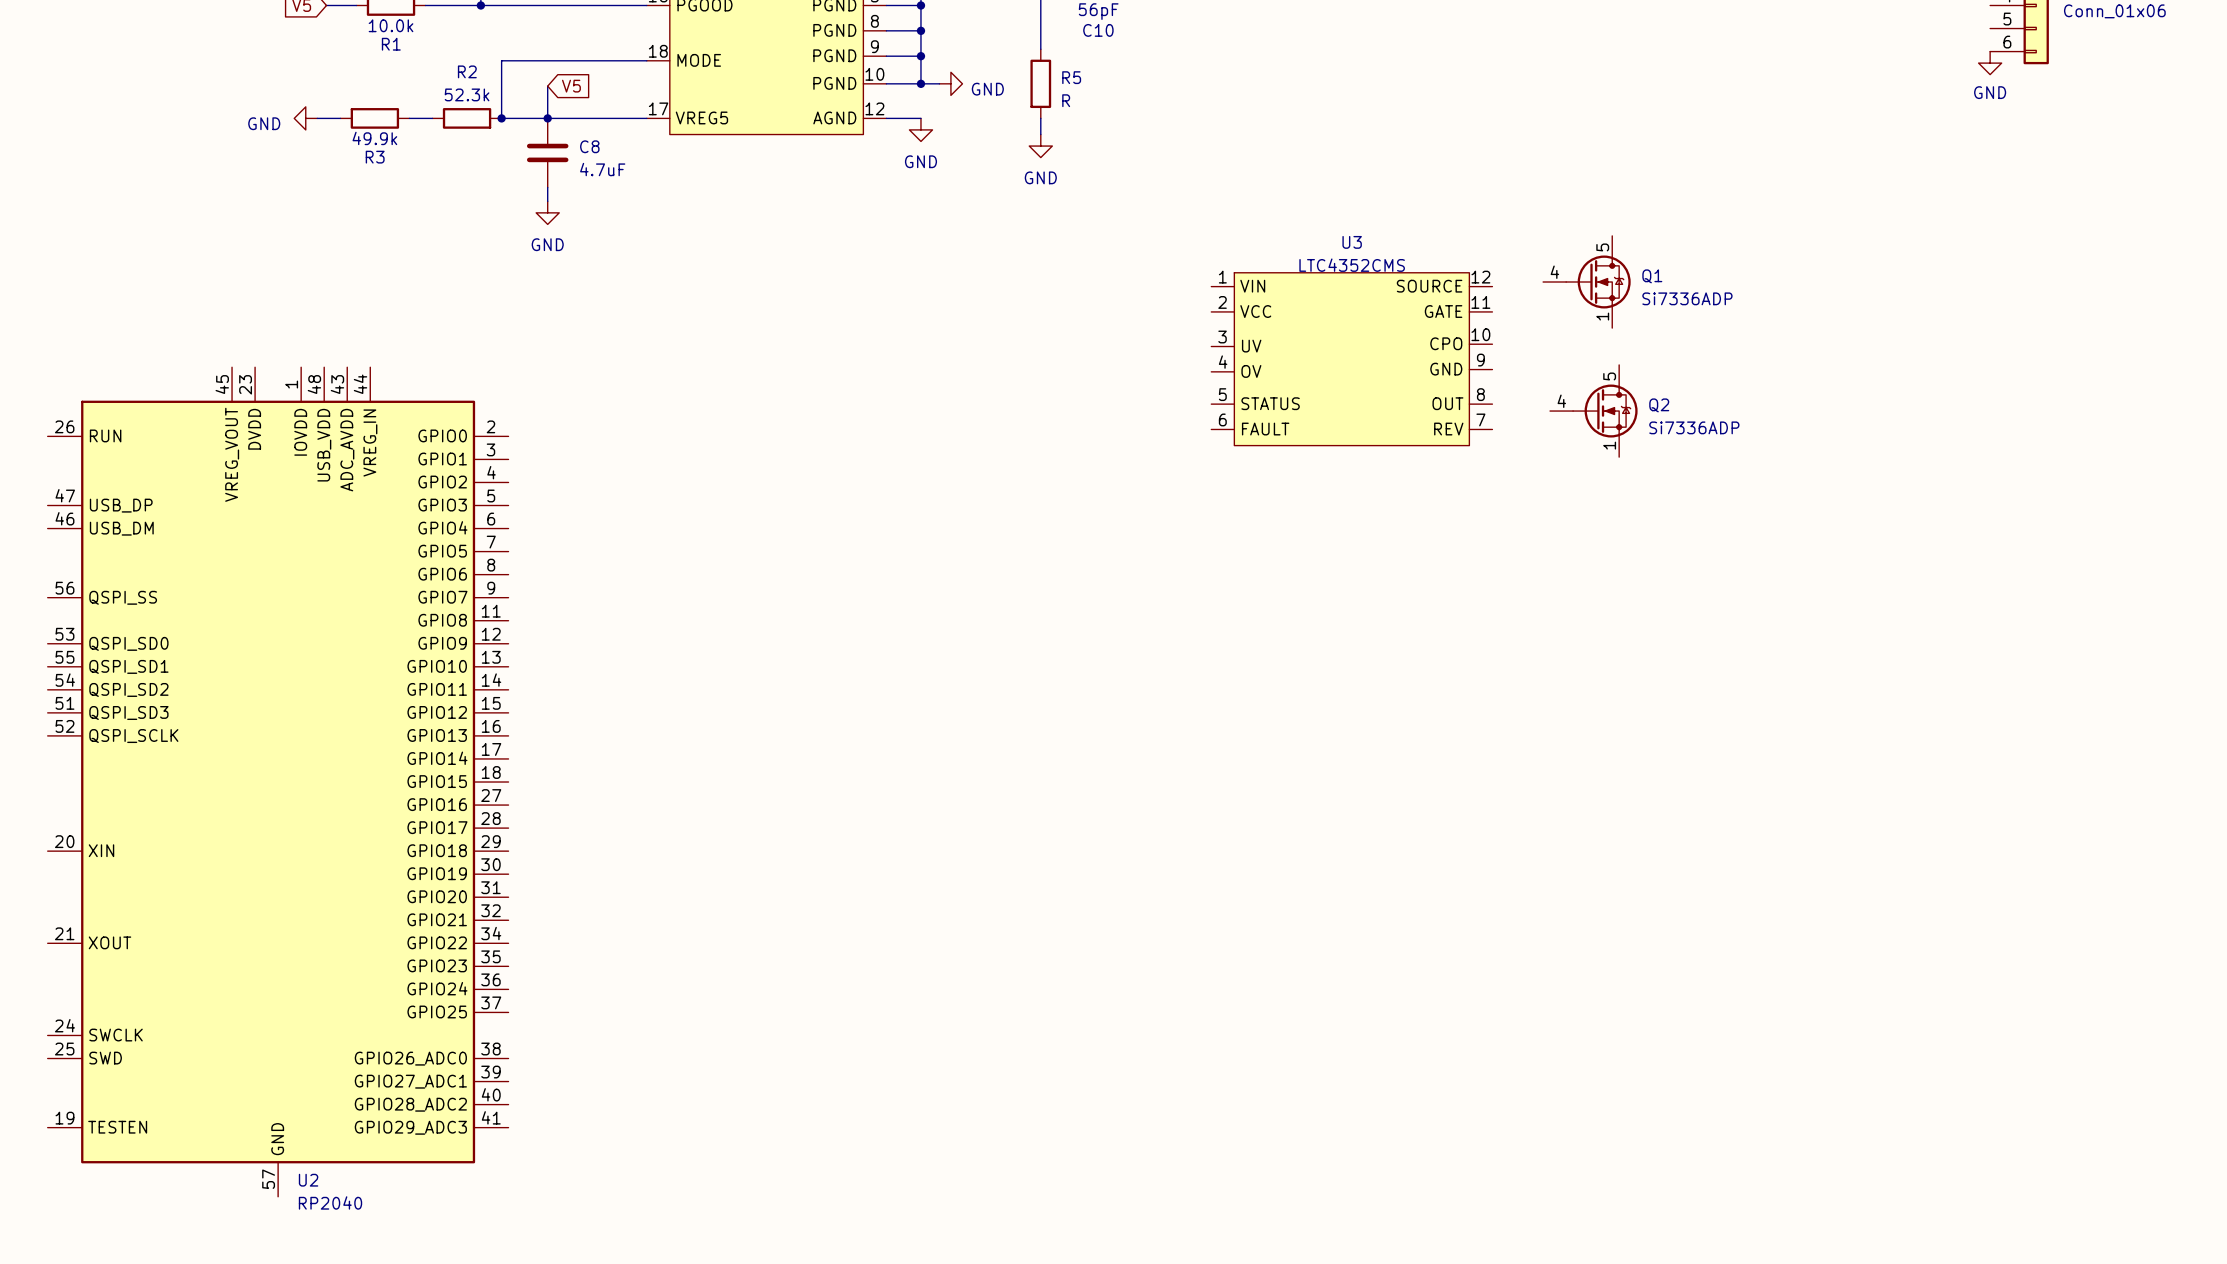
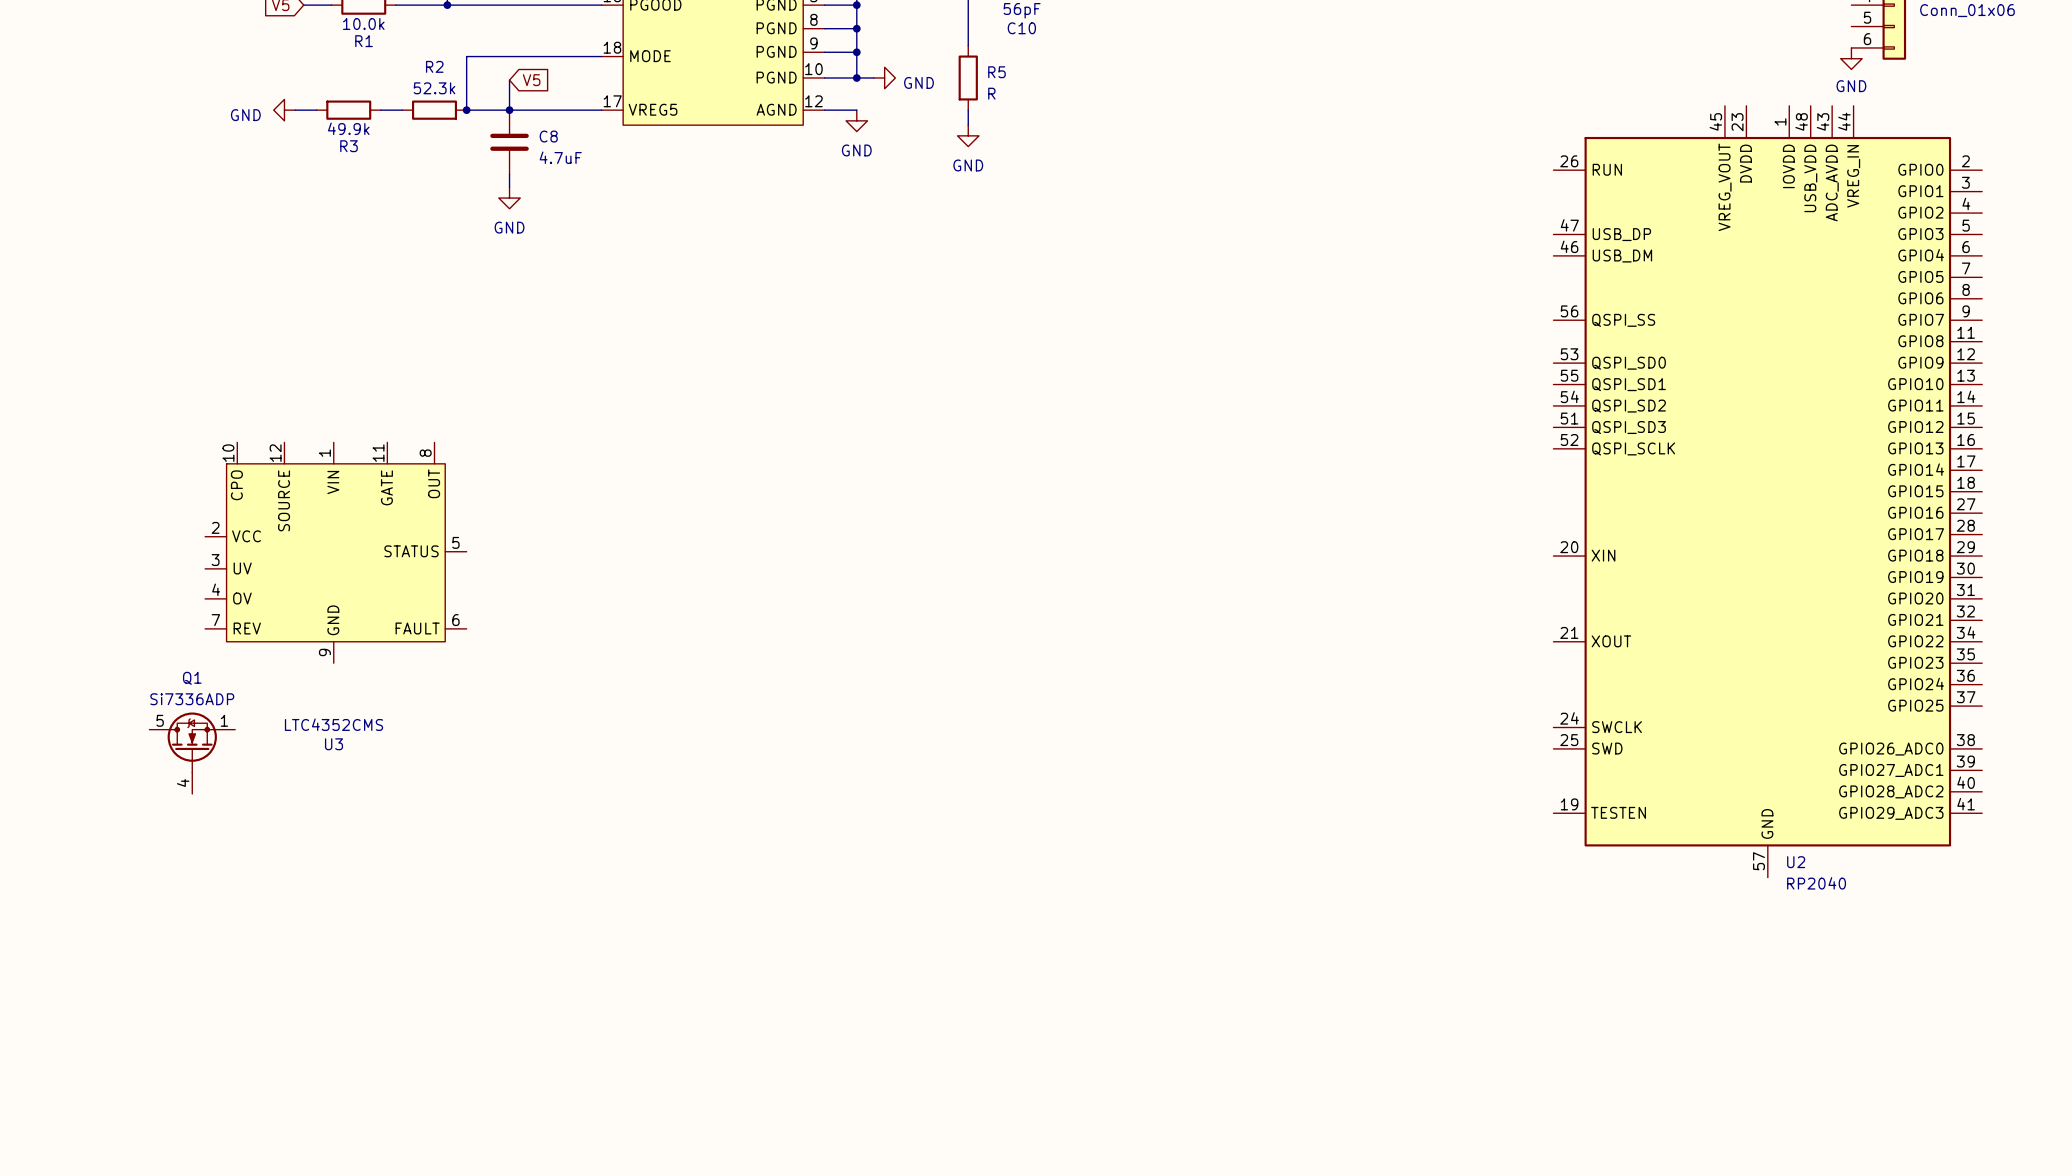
U3 name position: U3 (1352, 242) -> U3 (334, 744)
U3 value position: LTC4352CMS (1352, 265) -> LTC4352CMS (334, 724)
U3 symbol: [1211, 272, 1493, 446] -> [205, 442, 467, 664]
Q1 position: (1586, 282) -> (192, 753)
Q1 rotation: 0° (1598, 282) -> 90° counterclockwise (192, 742)
Q1 value position: Si7336ADP (1687, 298) -> Si7336ADP (192, 699)
Q2: Si7336ADP (1593, 411) -> none
U2 position: (278, 782) -> (1767, 491)

